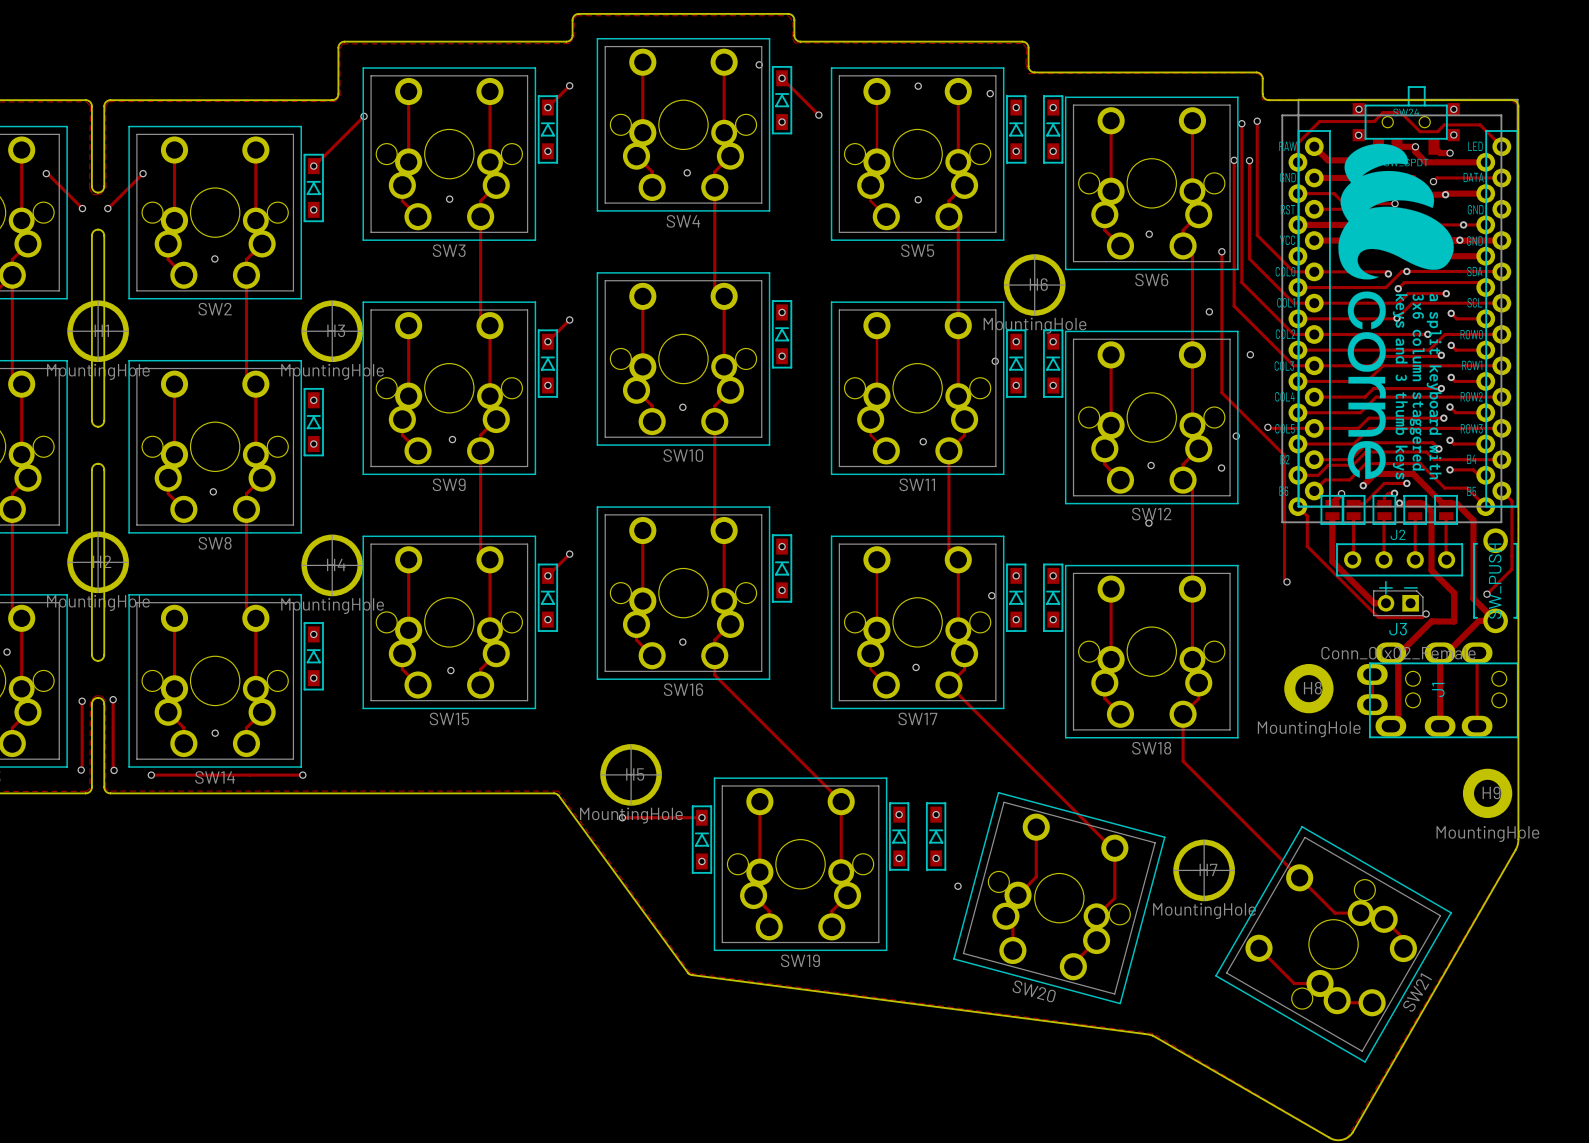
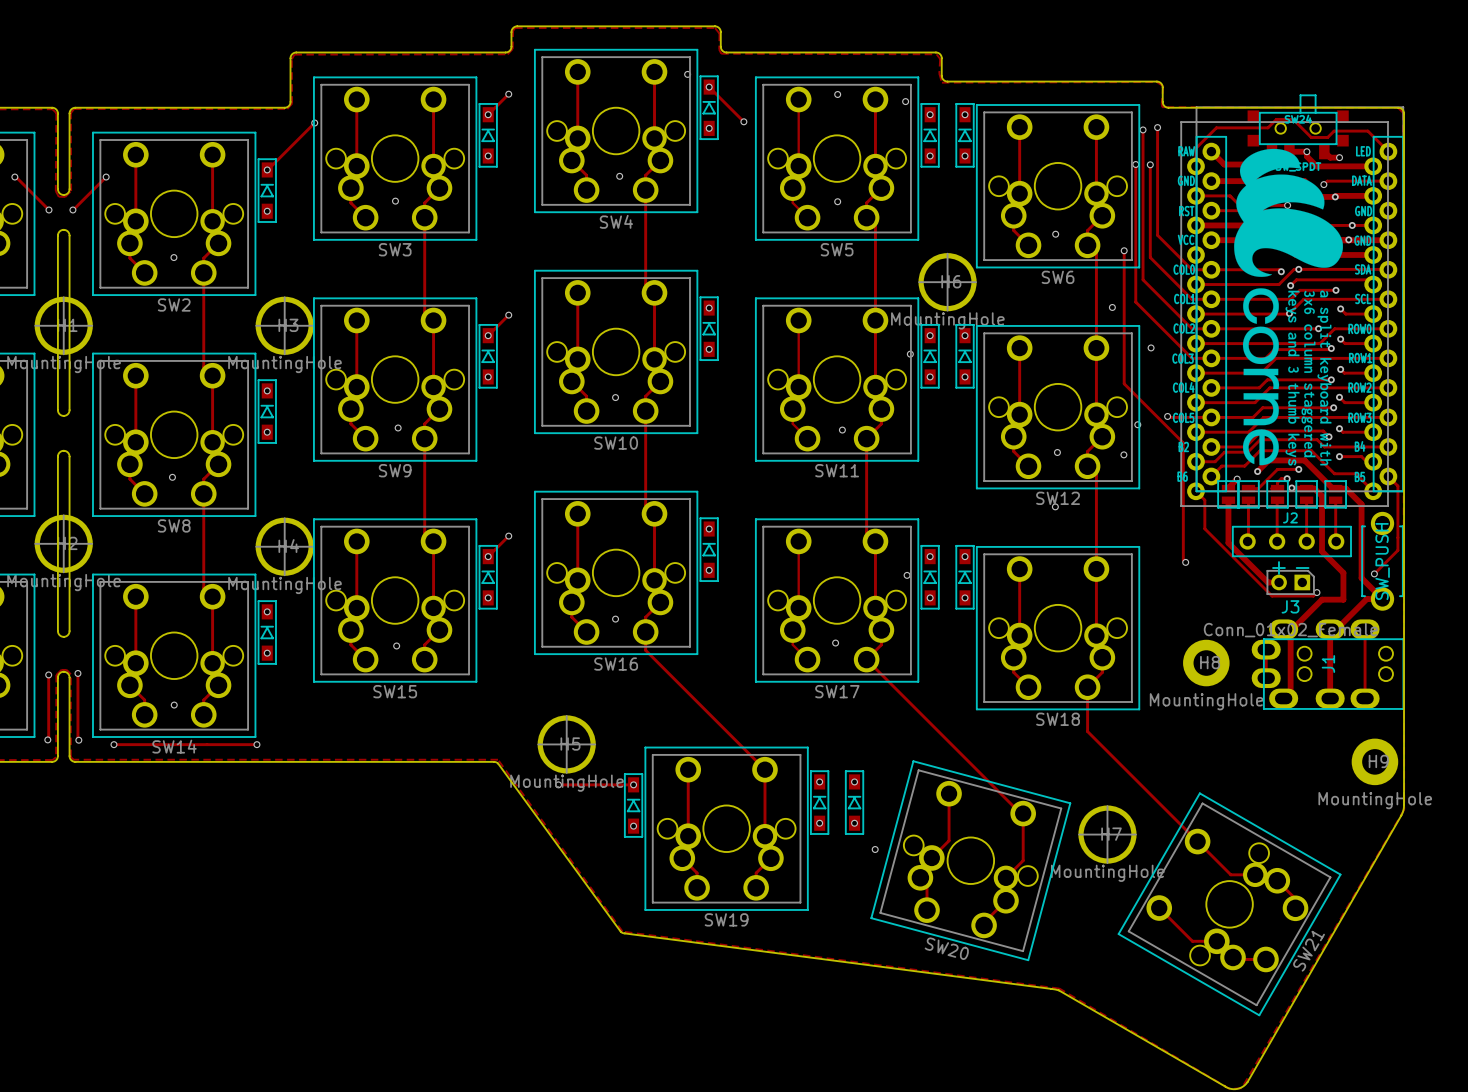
via: (1358, 109) -> none
via: (1453, 109) -> none
via: (1453, 134) -> none
via: (1358, 135) -> none

